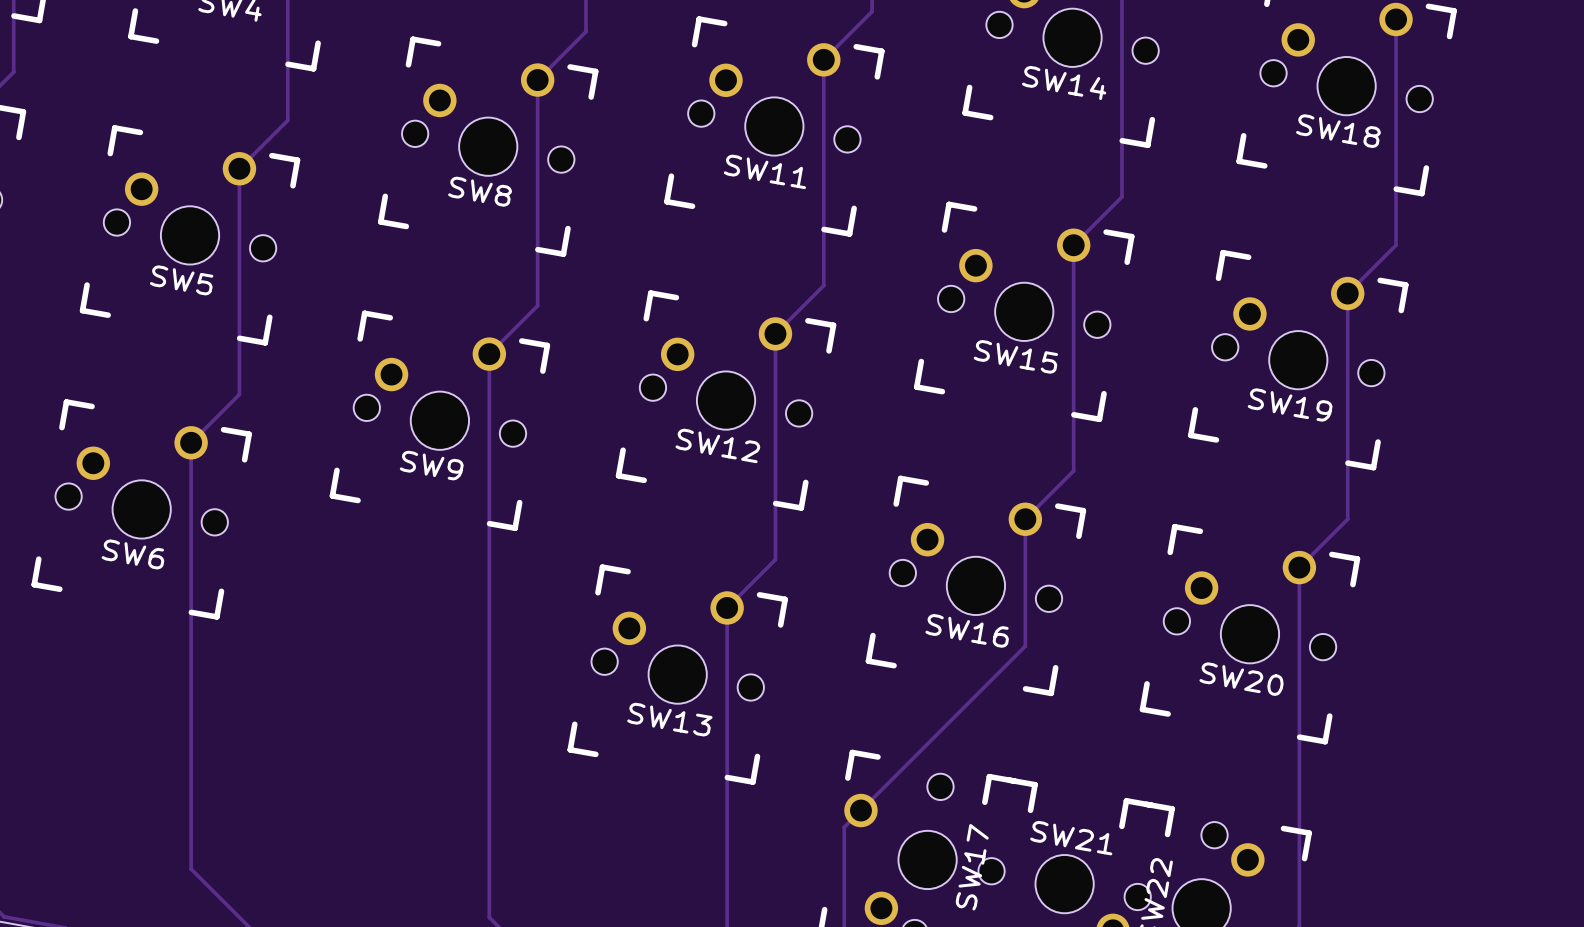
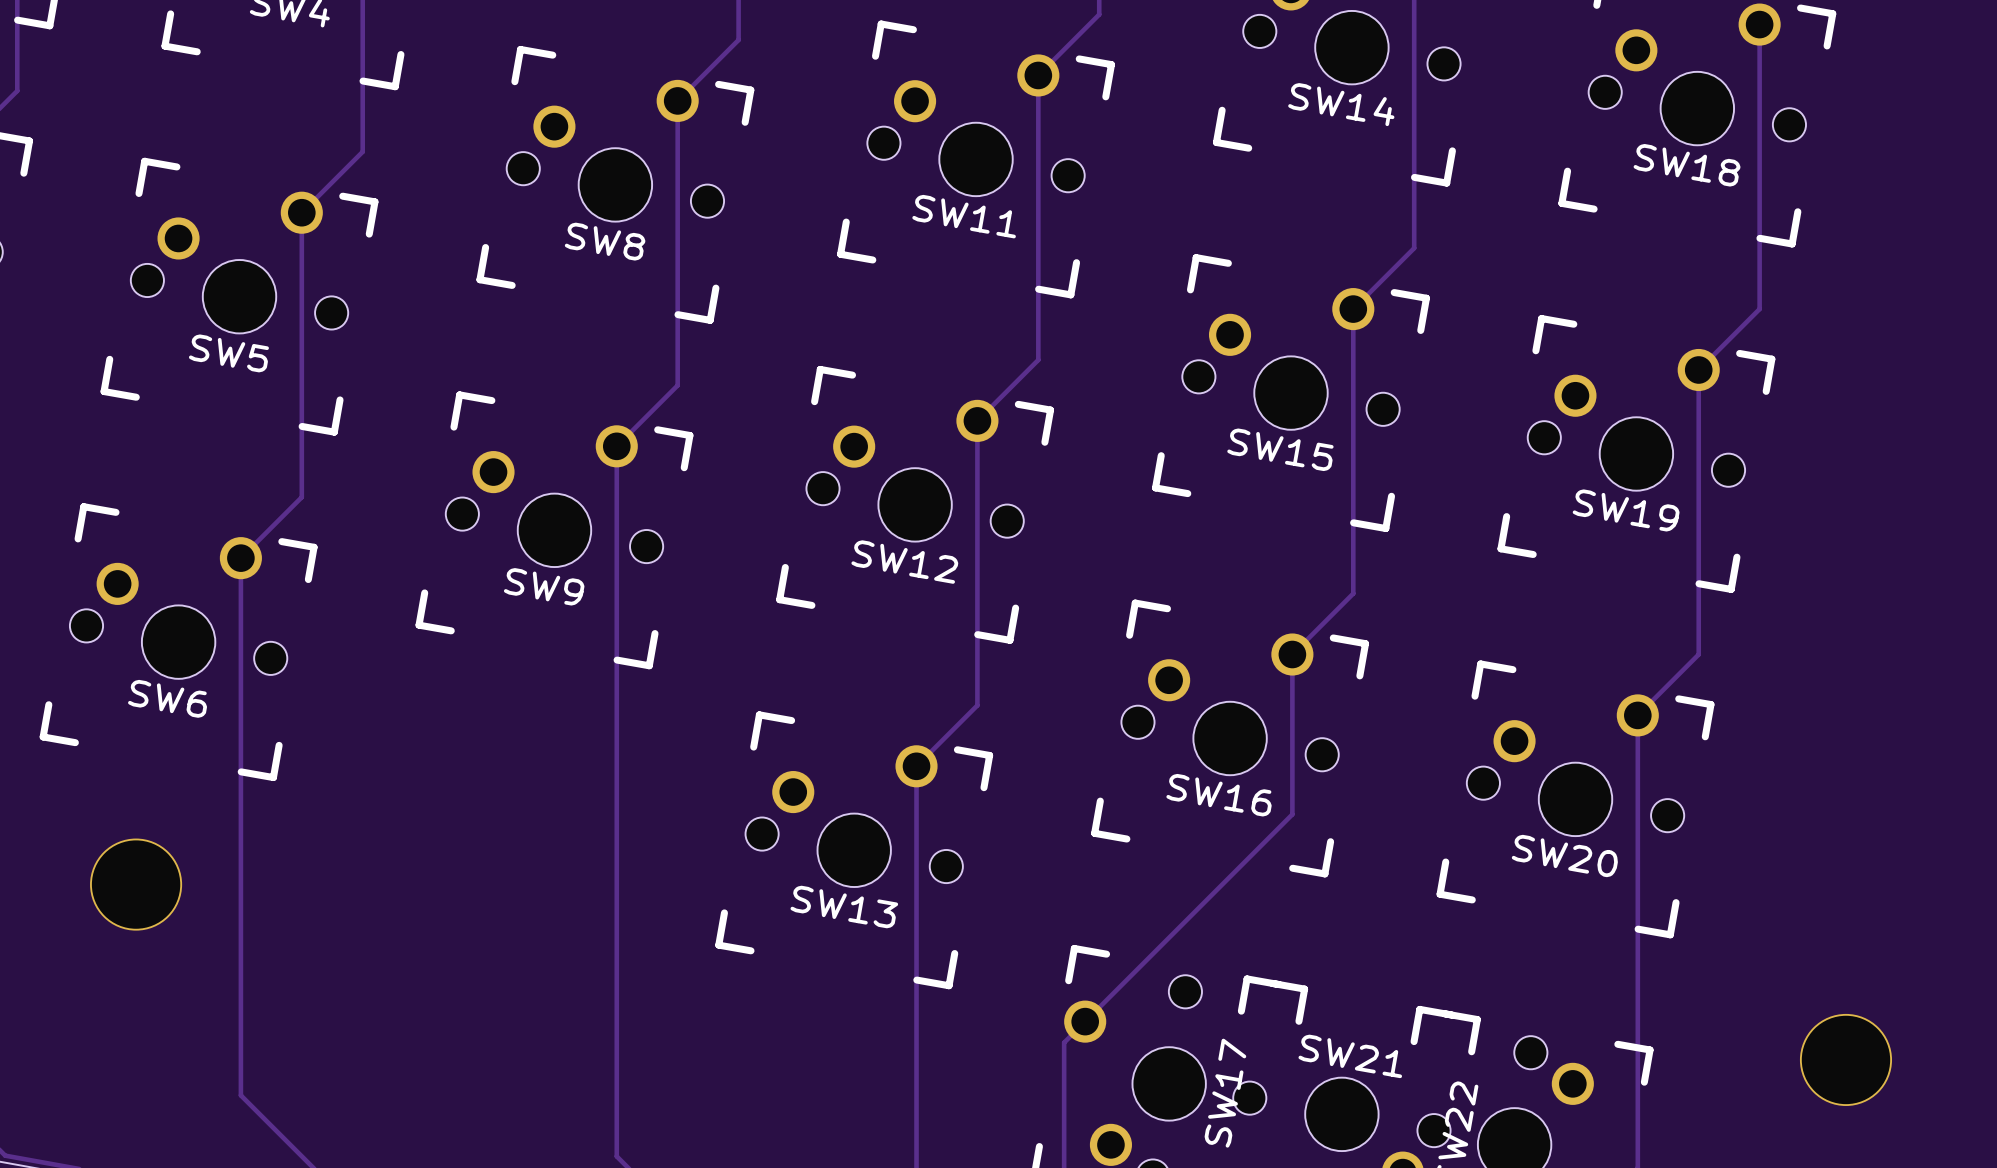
part: none -> (136, 884)
part: none -> (1845, 1059)

